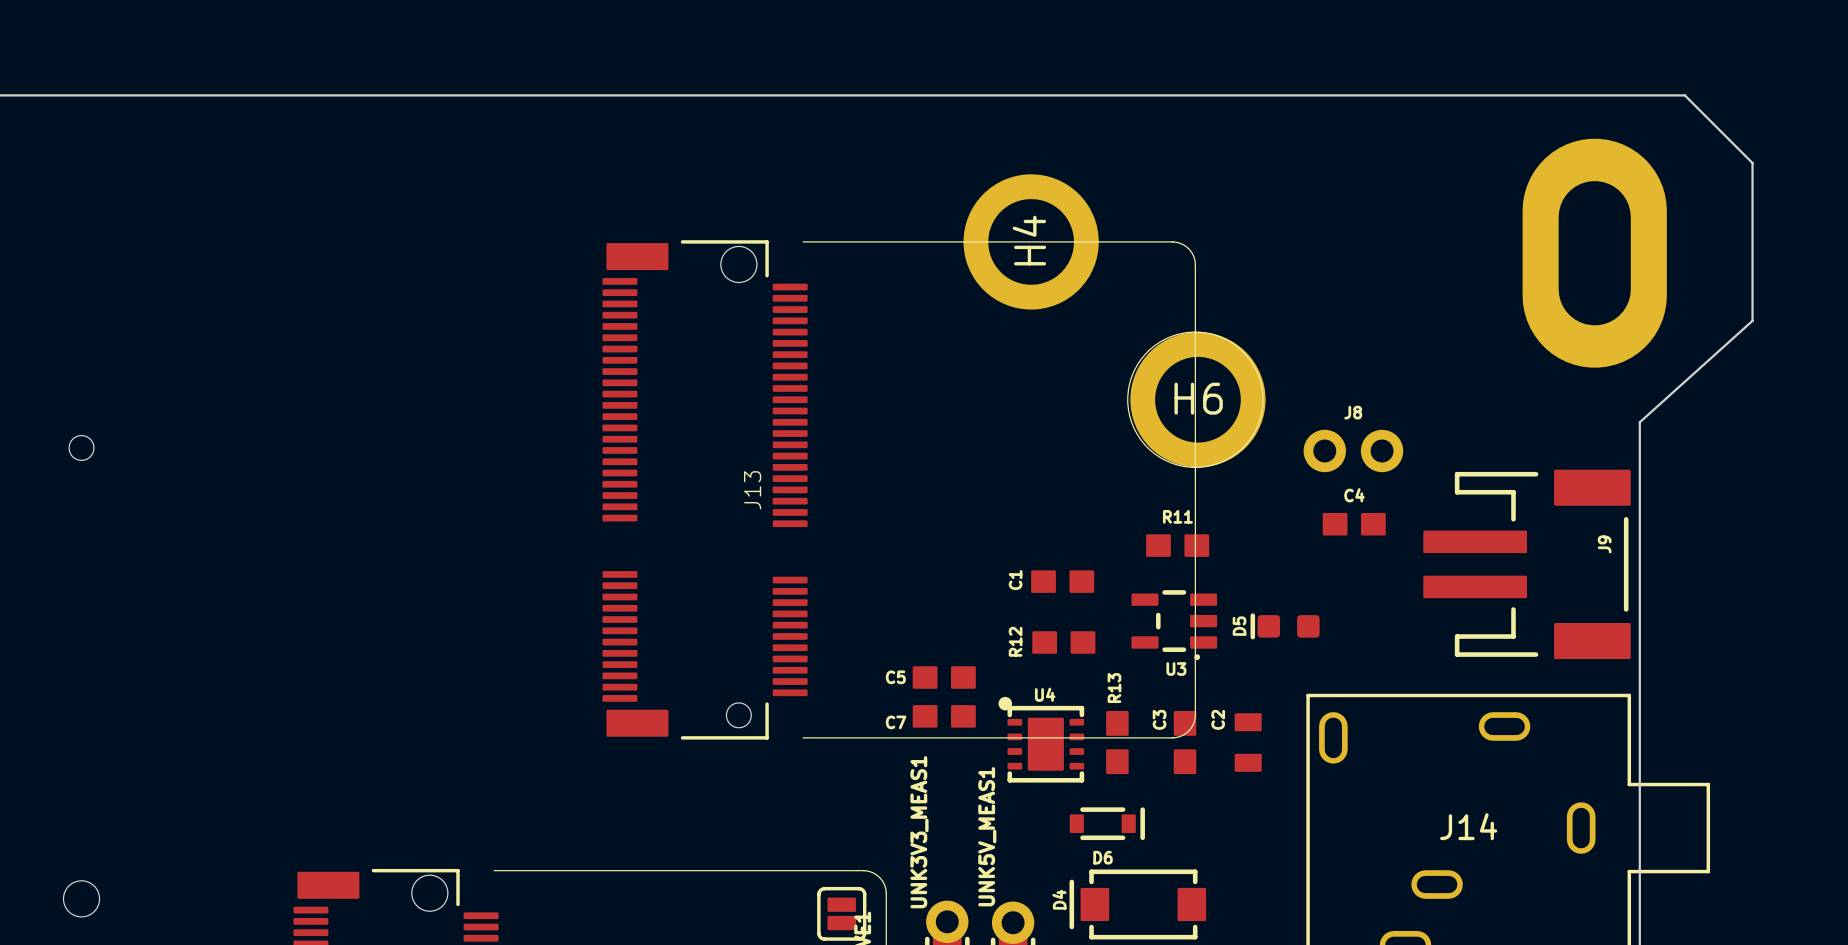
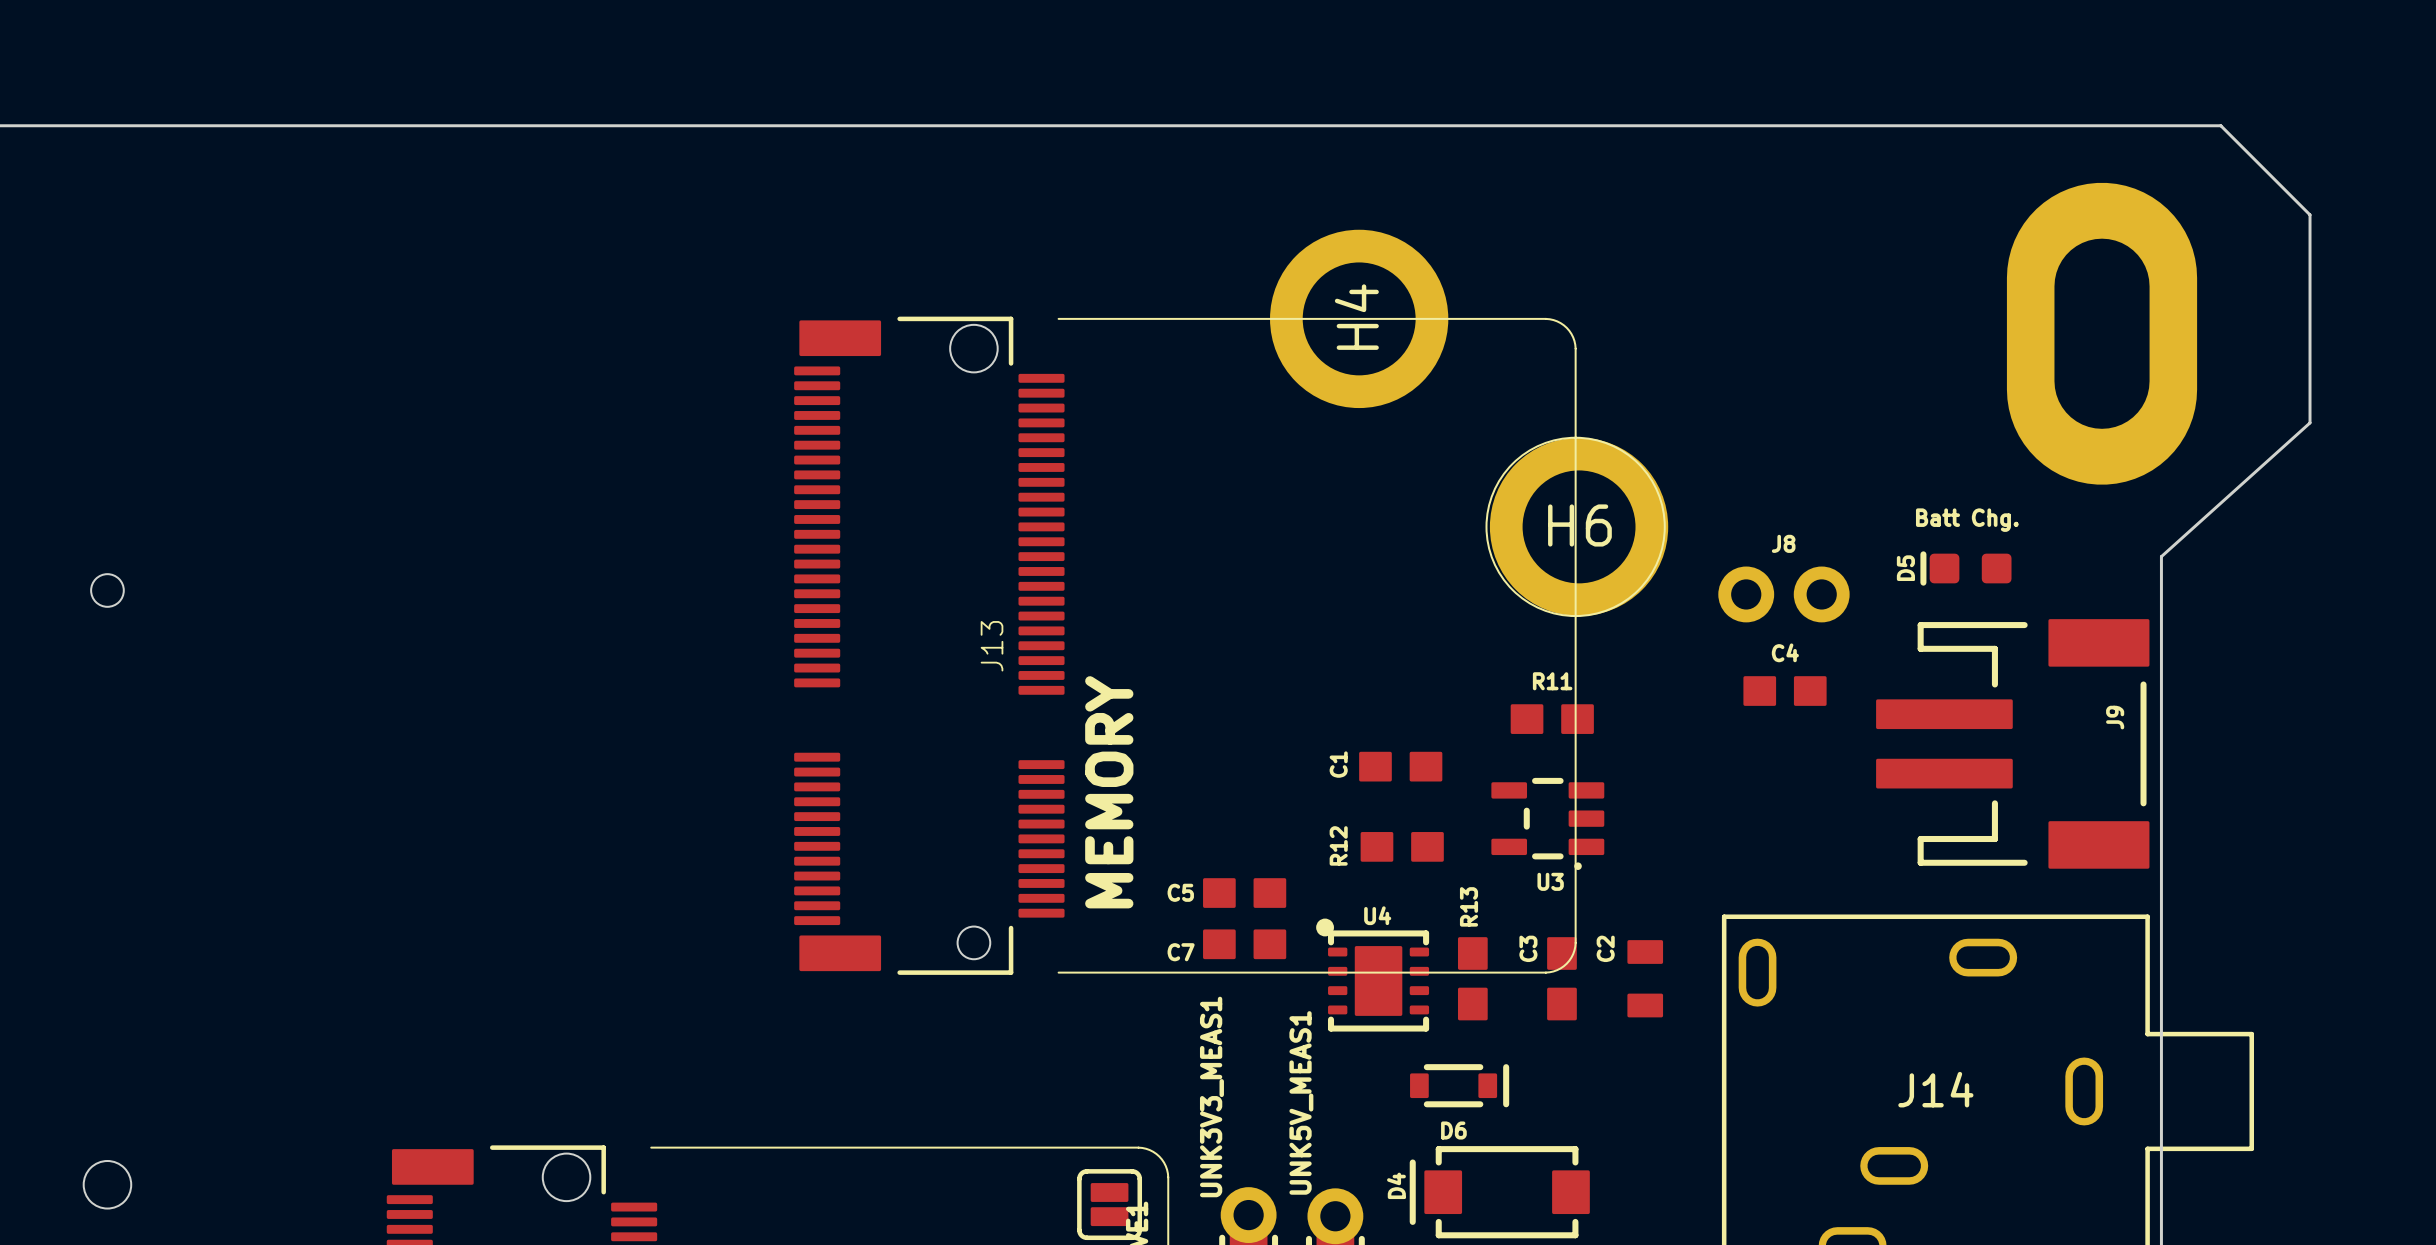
text: none -> Batt Chg. (1967, 520)
text: none -> MEMORY (1109, 792)
D5 position: (1285, 626) -> (1965, 568)

